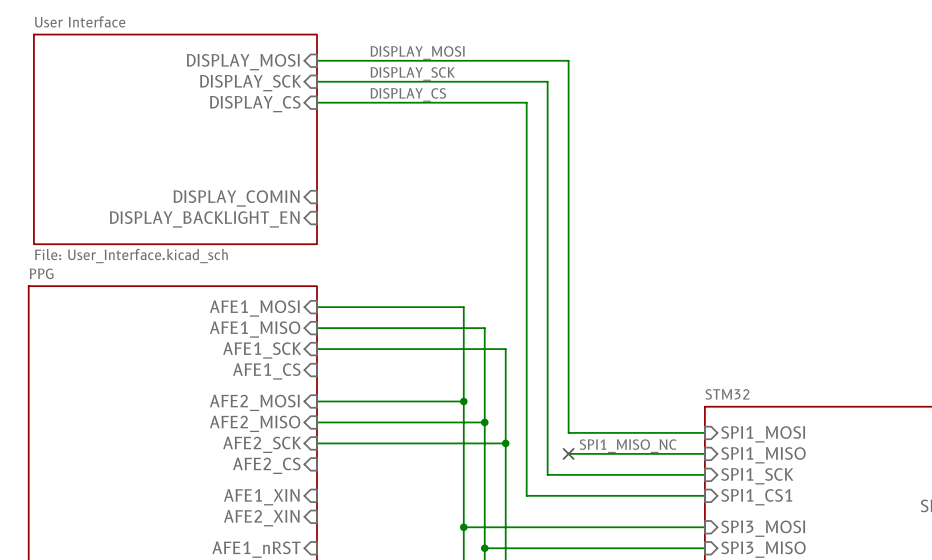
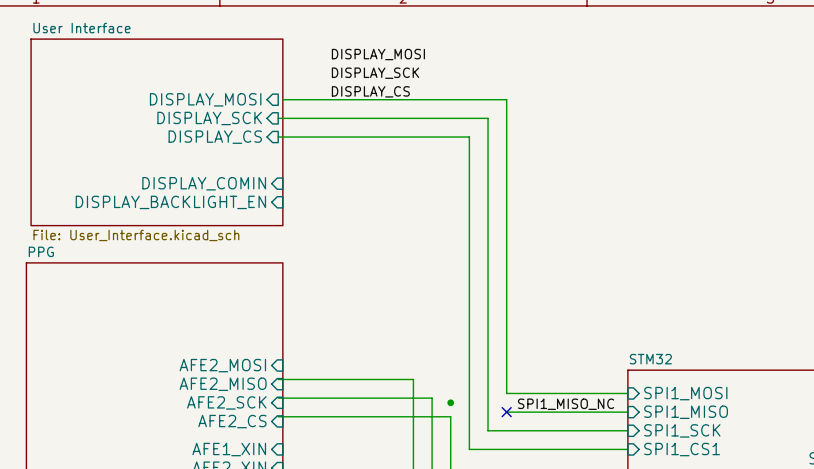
wire: (317, 60) (568, 60) (568, 102) -> none
sheet pin position: DISPLAY_MOSI (243, 62) -> DISPLAY_MOSI (205, 99)
wire: (317, 81) (547, 81) (547, 123) -> (278, 118) (488, 118)
sheet pin position: DISPLAY_SCK (250, 83) -> DISPLAY_SCK (209, 118)
wire: (526, 102) (526, 144) -> (469, 99) (506, 99)
sheet pin position: DISPLAY_CS (255, 104) -> DISPLAY_CS (215, 137)
wire: none -> (278, 137) (469, 137)
wire: (317, 307) (463, 307) (463, 417) -> (278, 379) (413, 379)
sheet pin: AFE1_MOSI (254, 308) -> none
wire: (317, 328) (484, 328) (484, 438) -> (278, 398) (432, 398)
sheet pin: AFE1_MISO (255, 329) -> none
wire: (317, 349) (505, 349) (505, 459) -> (278, 416) (450, 416)
sheet pin: AFE1_SCK (262, 350) -> none
sheet pin: AFE1_CS (266, 371) -> none
wire: (317, 401) (463, 401) -> none
junction: (463, 401) -> none
wire: (317, 422) (484, 422) -> none
junction: (484, 422) -> none
wire: (317, 443) (505, 443) -> none

